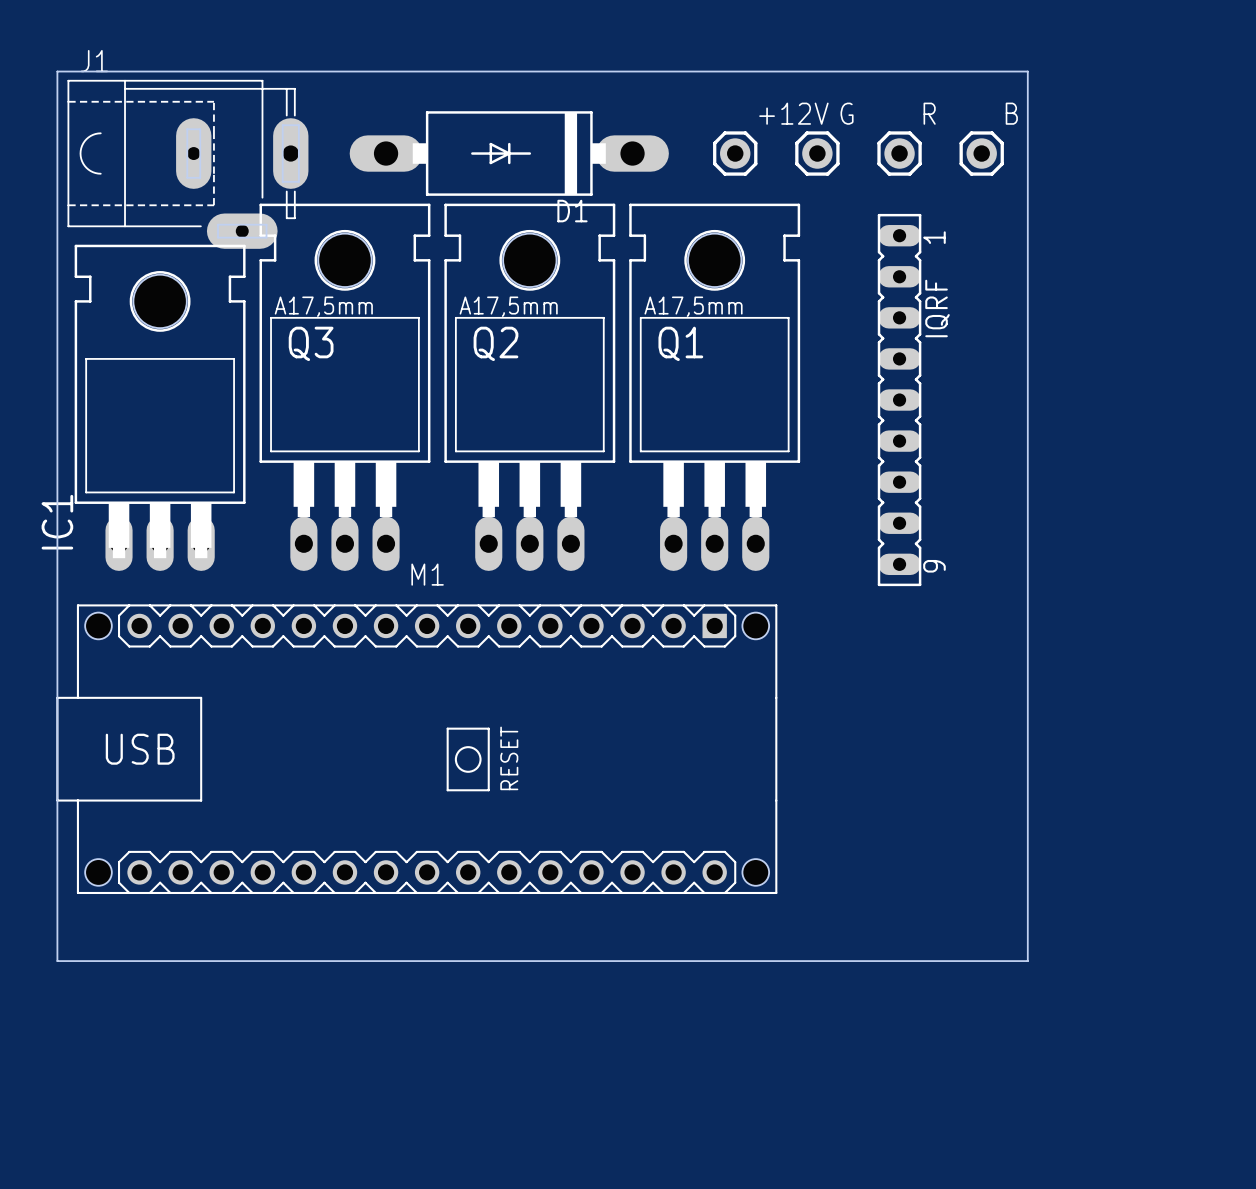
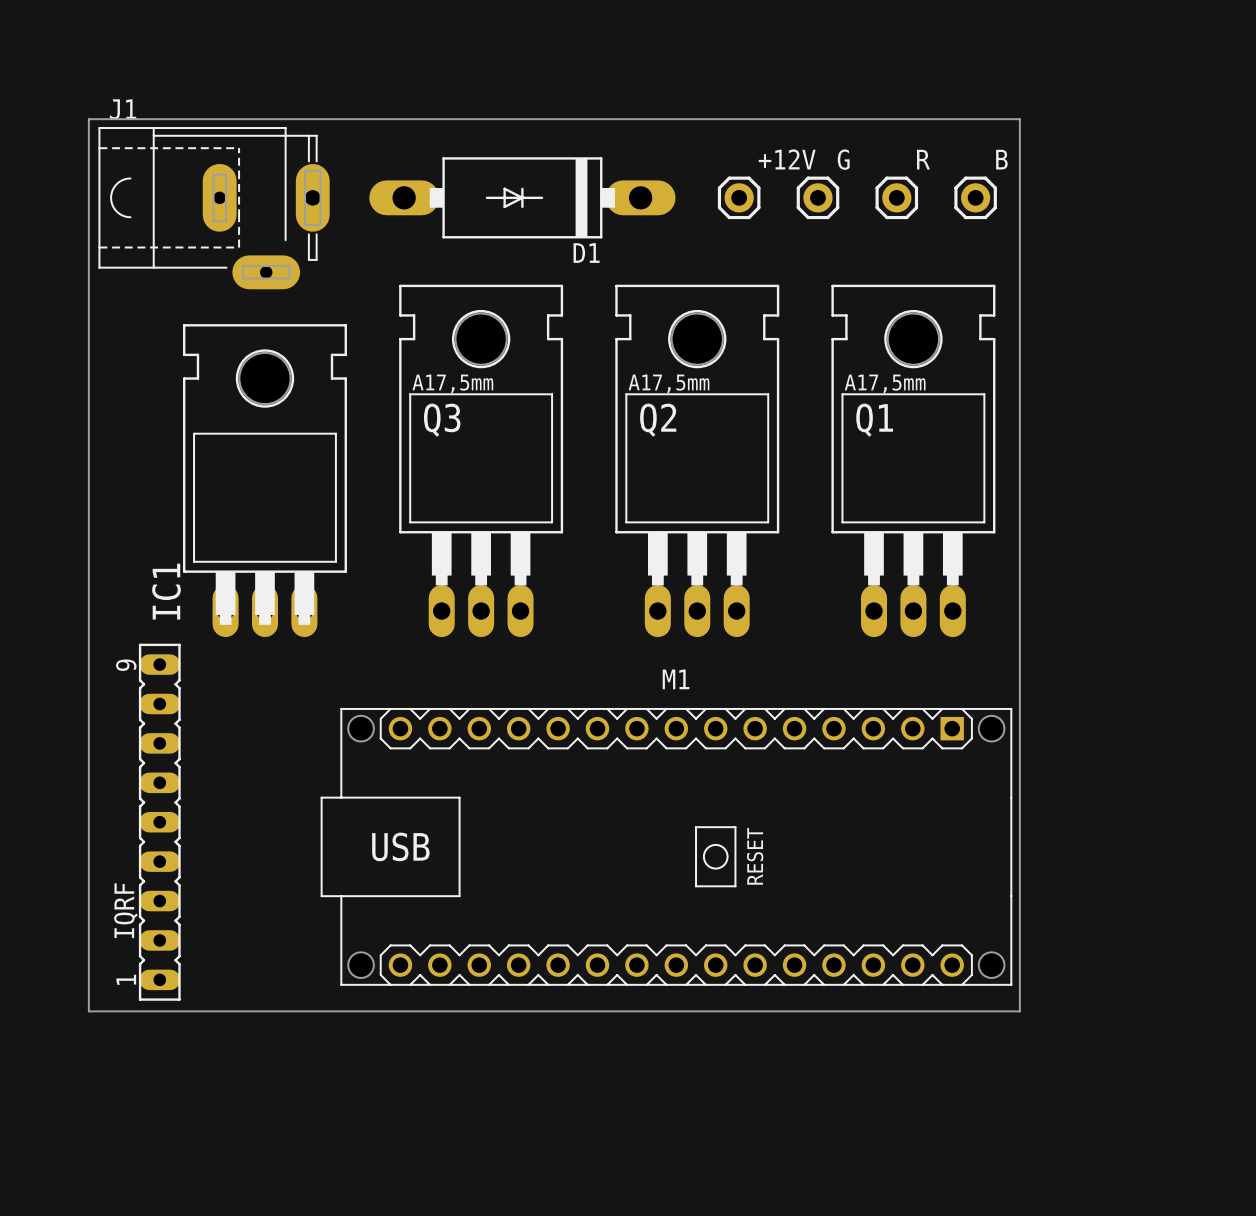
Q3 position: (344, 387) -> (481, 460)
Q2 position: (529, 387) -> (697, 460)
Q1 position: (714, 387) -> (913, 460)
IQRF: (899, 400) -> none
IC1 position: (160, 407) -> (264, 480)
M1 position: (416, 749) -> (666, 846)
IQRF: none -> (159, 822)
board edge: (57, 961) (1027, 961) -> (88, 972) (88, 1011) (1019, 1011) (1019, 972)

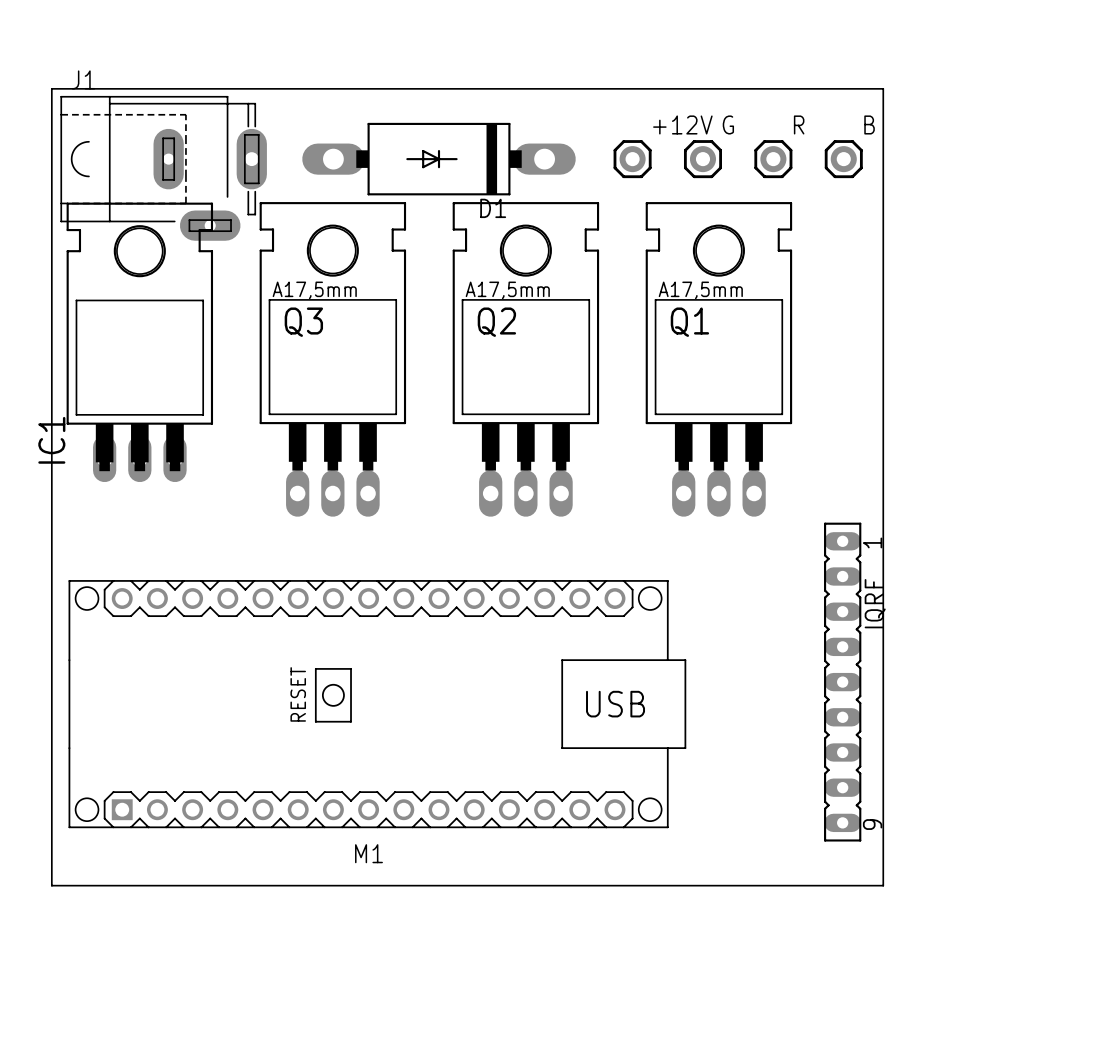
Q3 position: (481, 460) -> (332, 359)
Q2 position: (697, 460) -> (525, 359)
Q1 position: (913, 460) -> (718, 359)
IC1 position: (264, 480) -> (139, 342)
M1 name position: M1 (676, 679) -> M1 (368, 853)
M1 footprint: [320, 707, 1013, 986] -> [68, 580, 687, 829]
IQRF: none -> (842, 682)
IQRF: (159, 822) -> none

